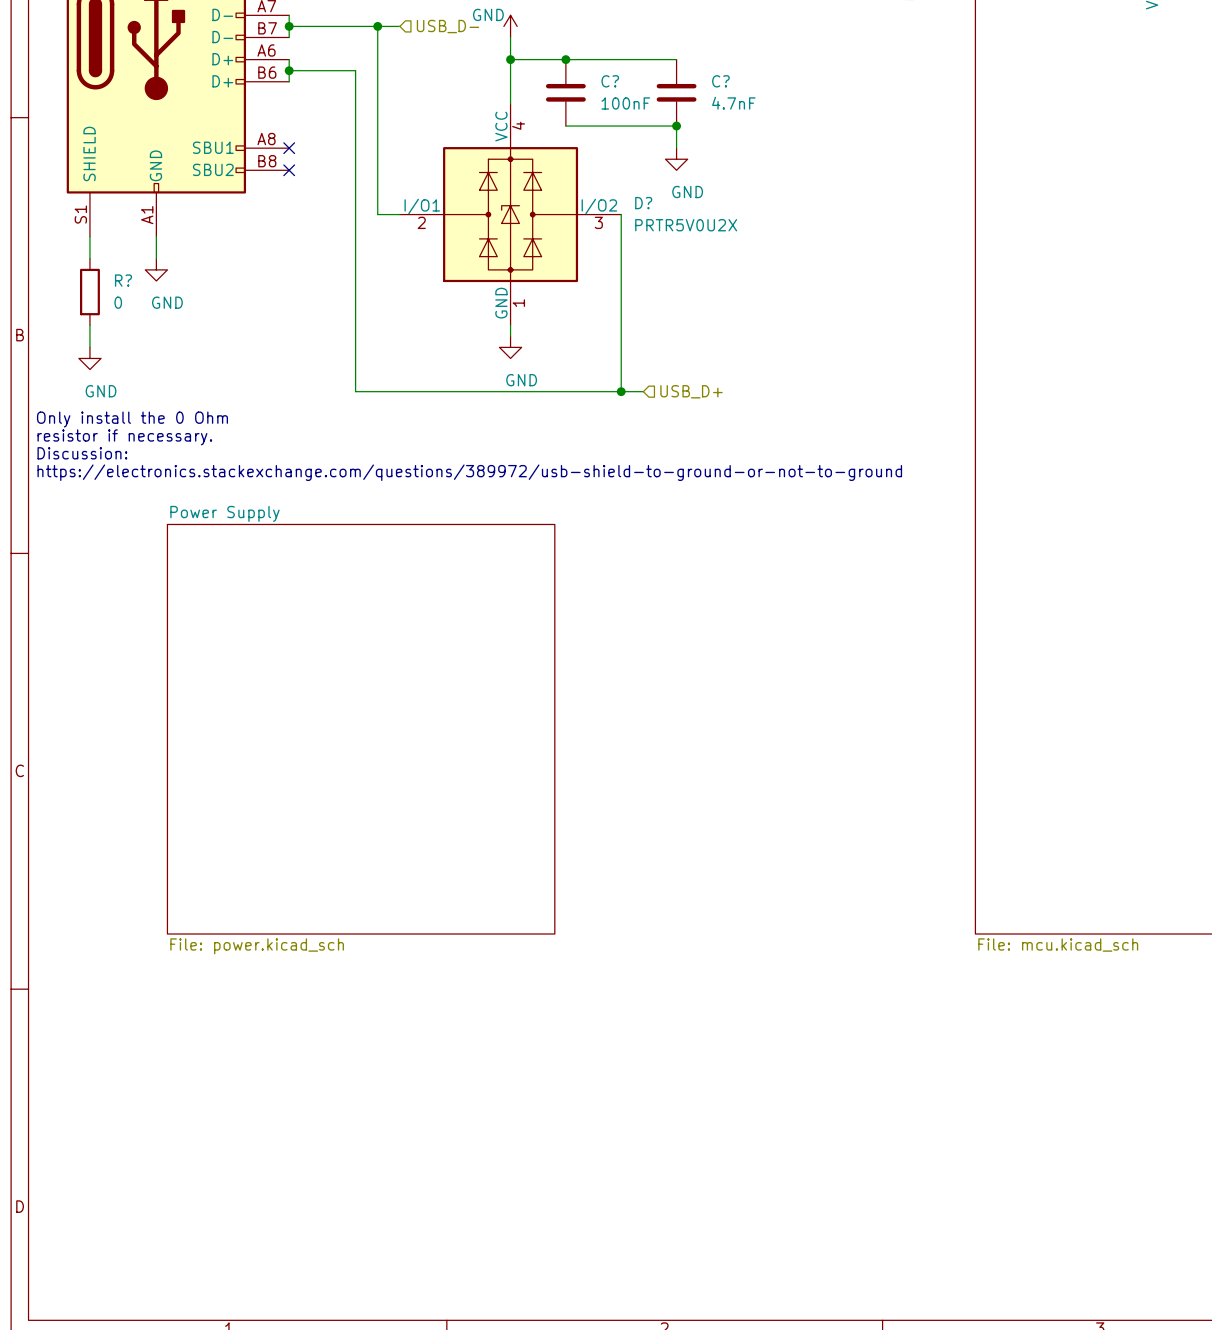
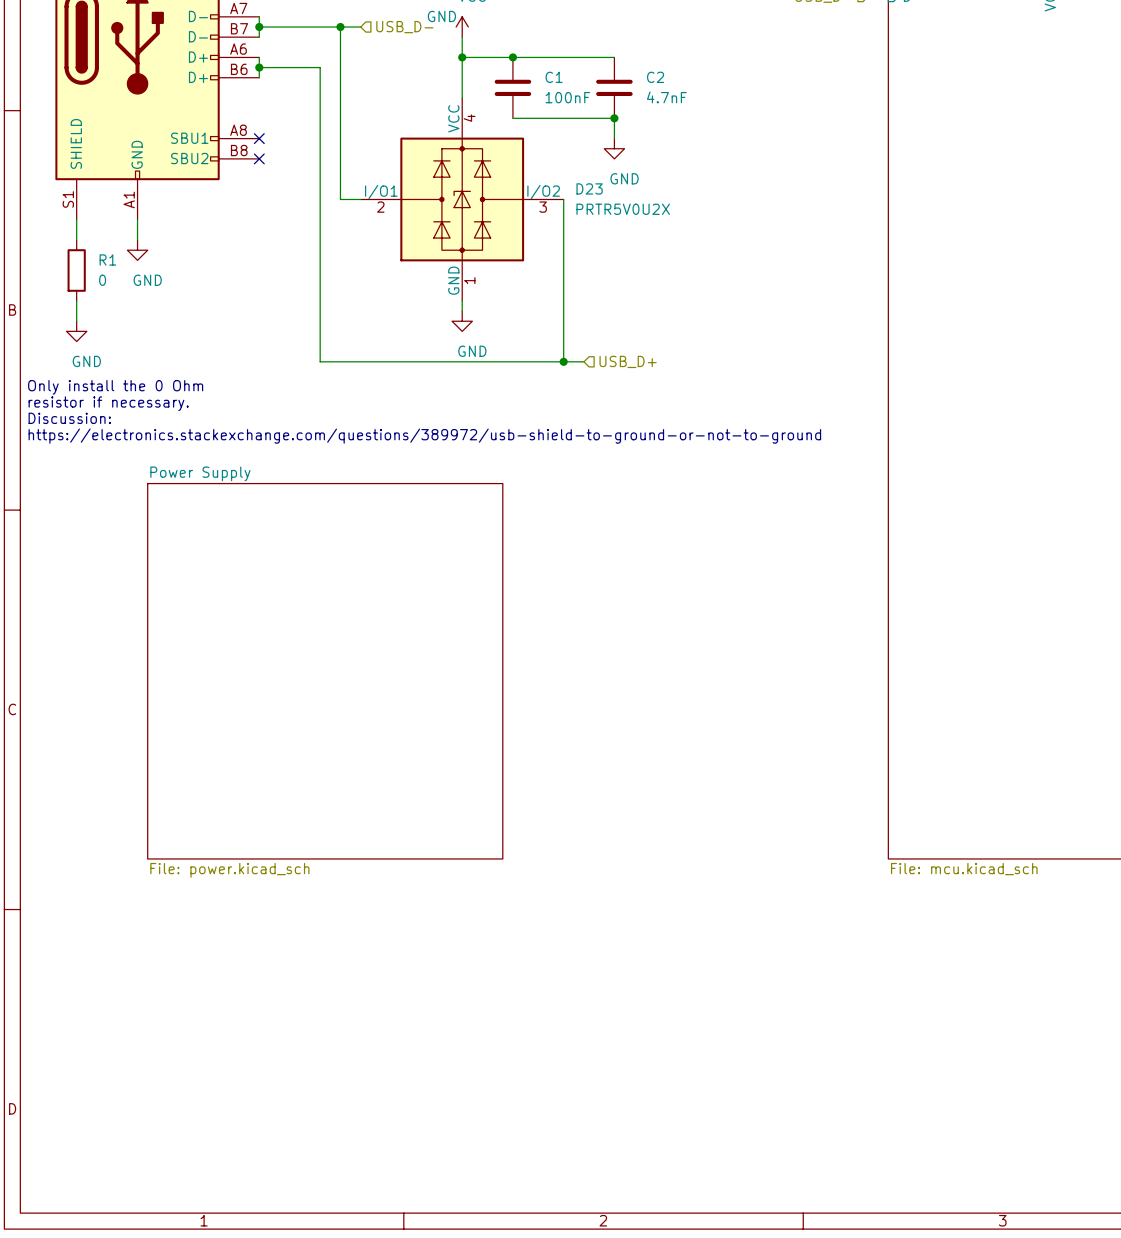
C? name: C? (610, 81) -> C1 (554, 77)
C? name: C? (720, 81) -> C2 (655, 77)
D? name: D? (643, 203) -> D23 (589, 188)
R? name: R? (123, 280) -> R1 (107, 259)

